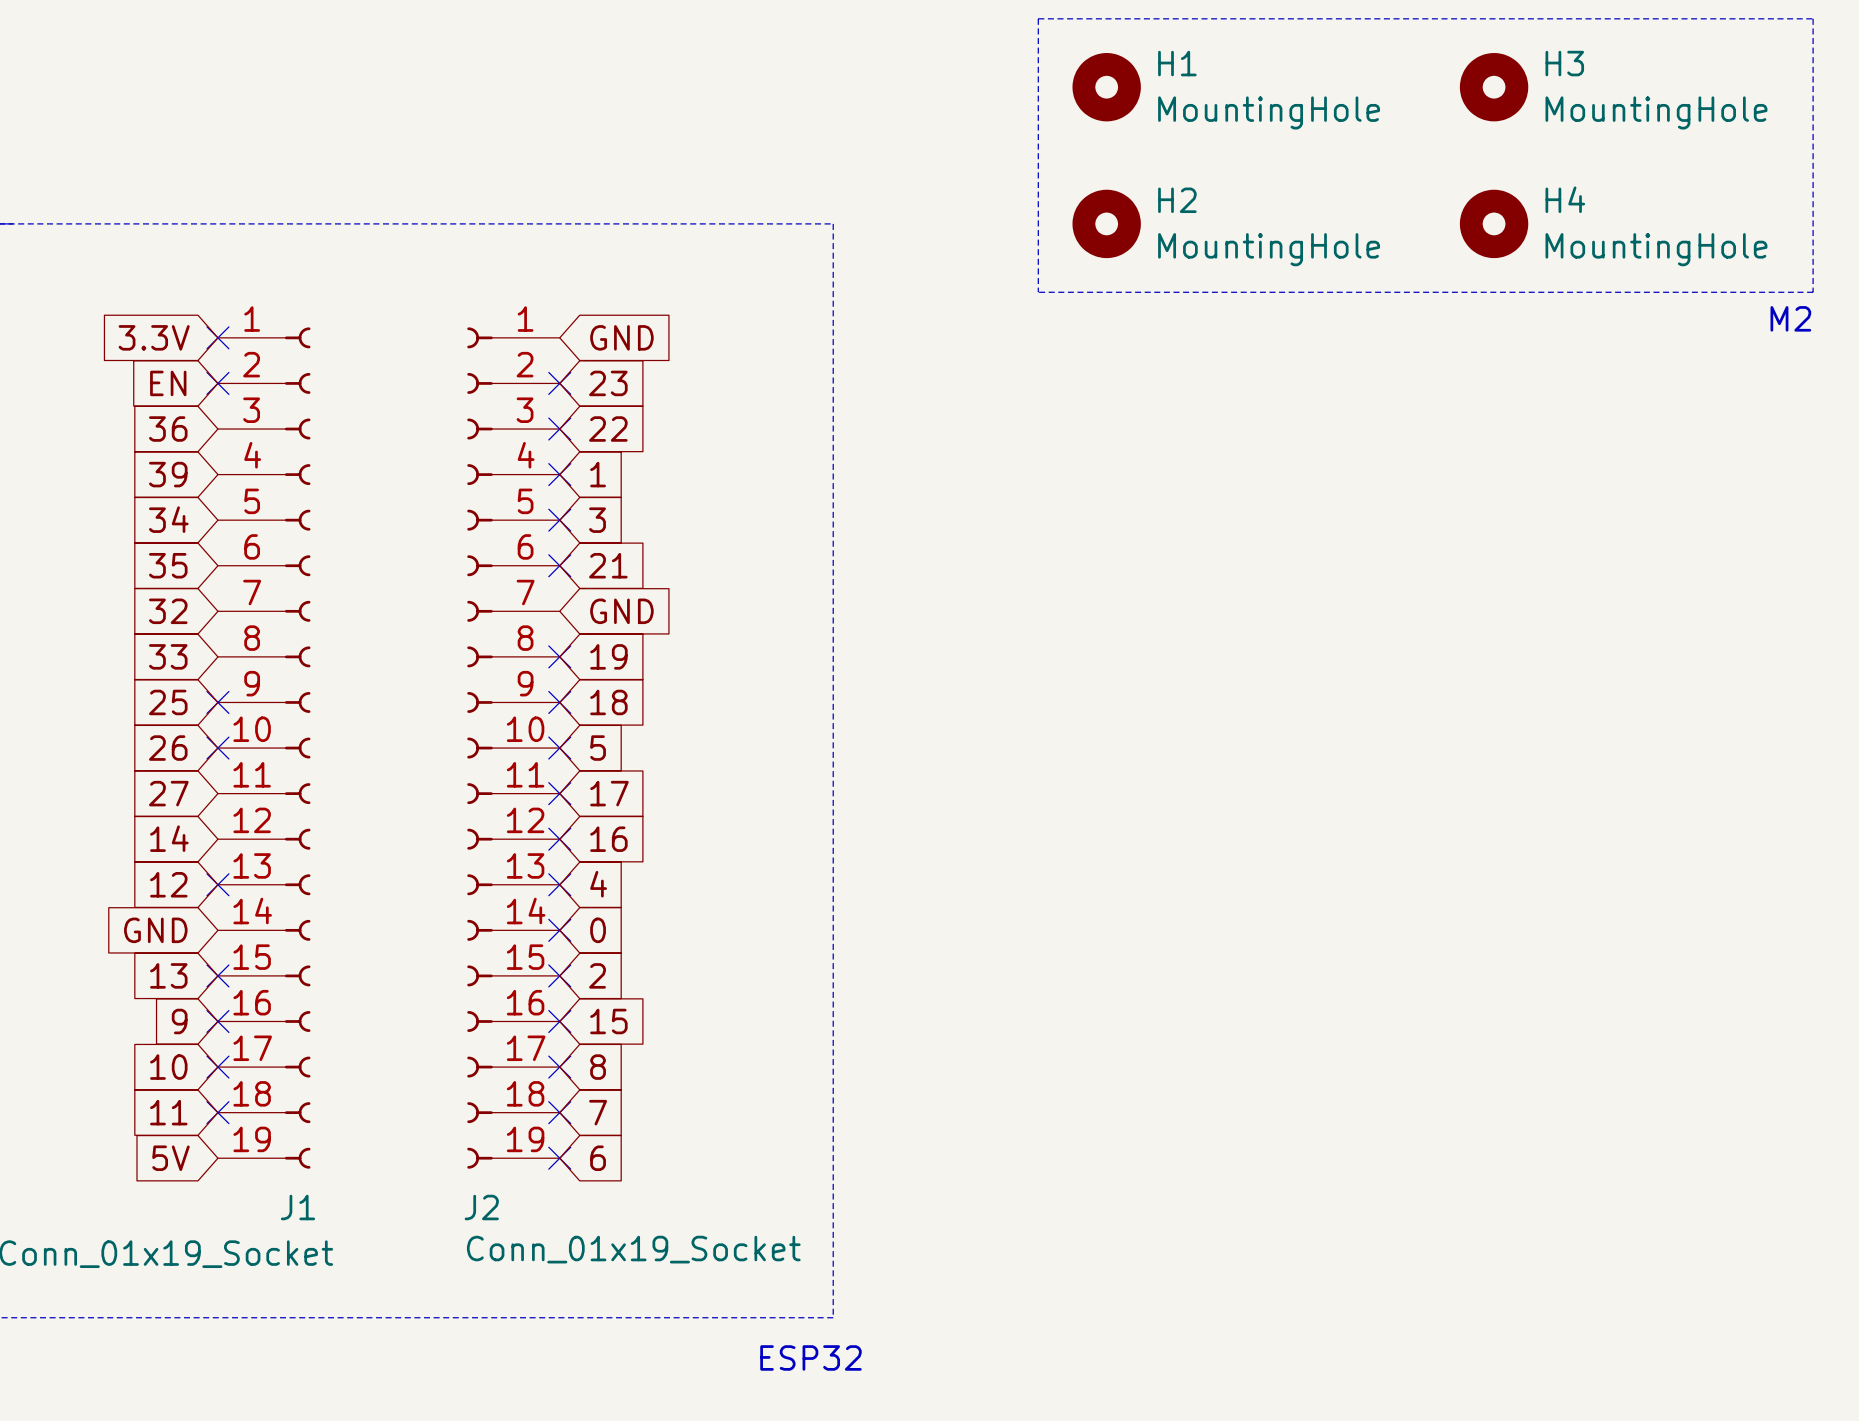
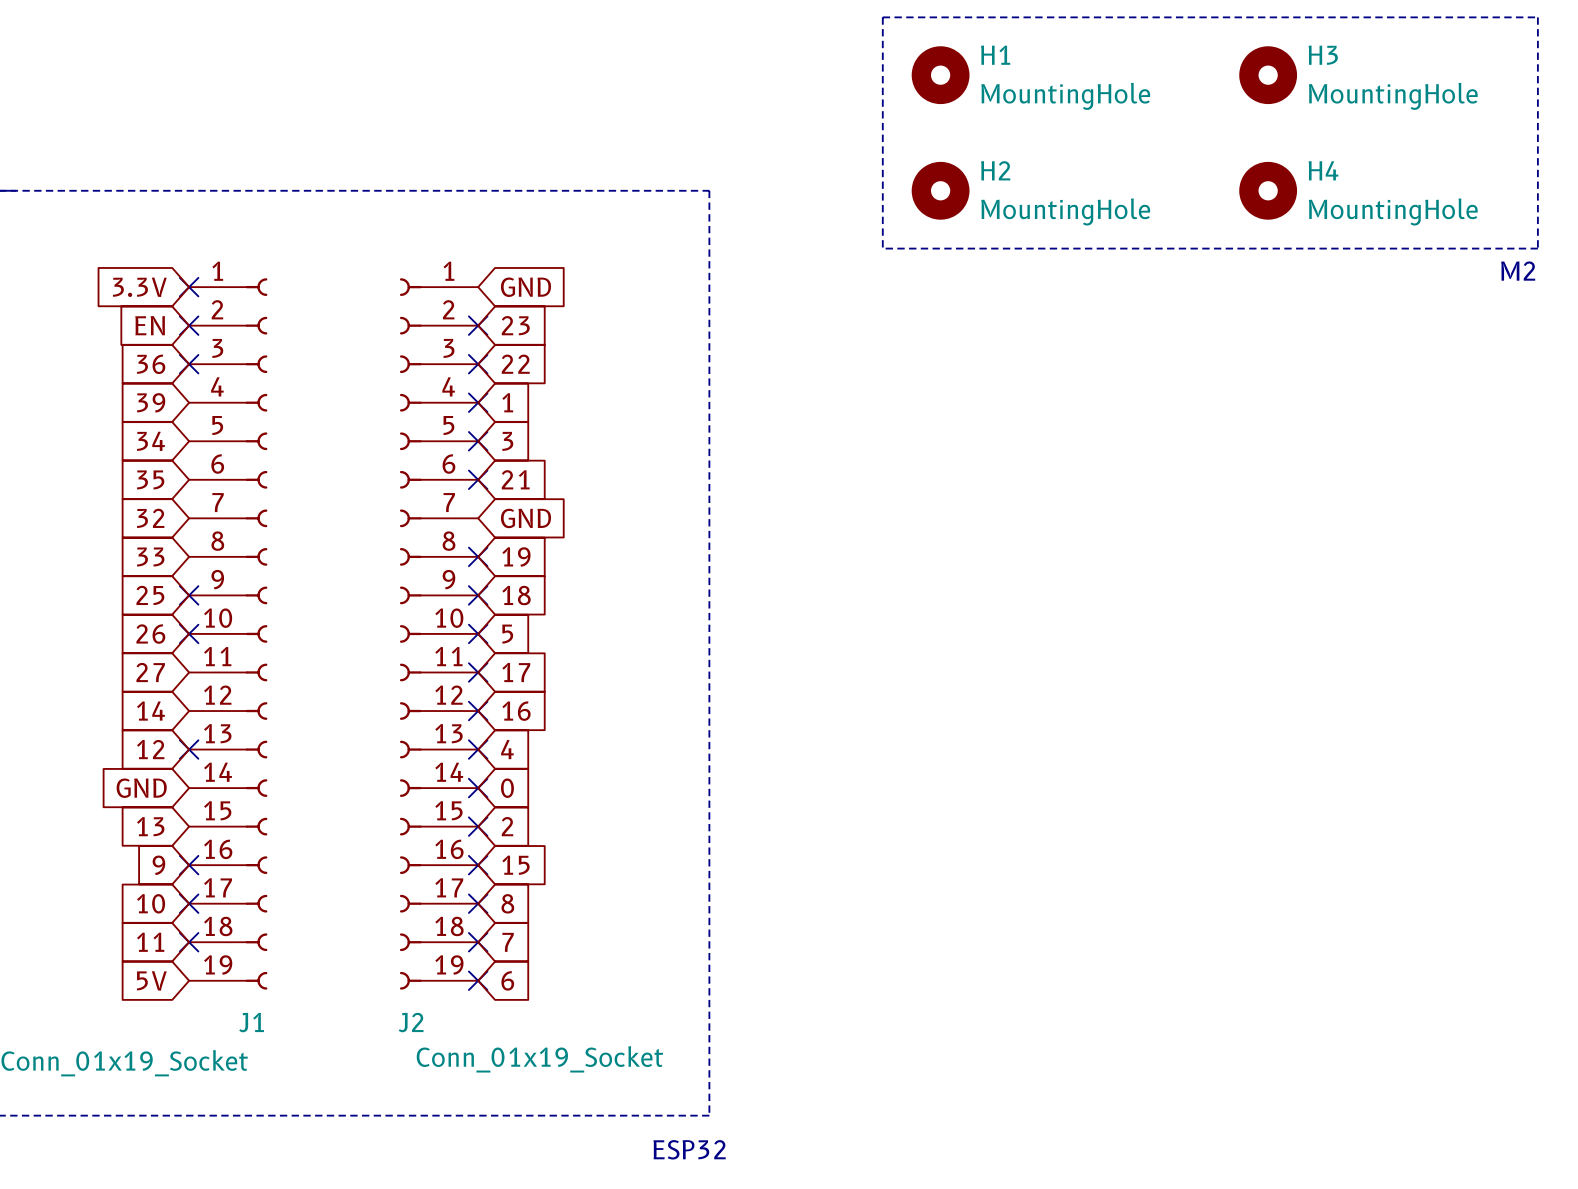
no-connect mark: none -> (189, 364)
no-connect mark: (217, 975) -> none

